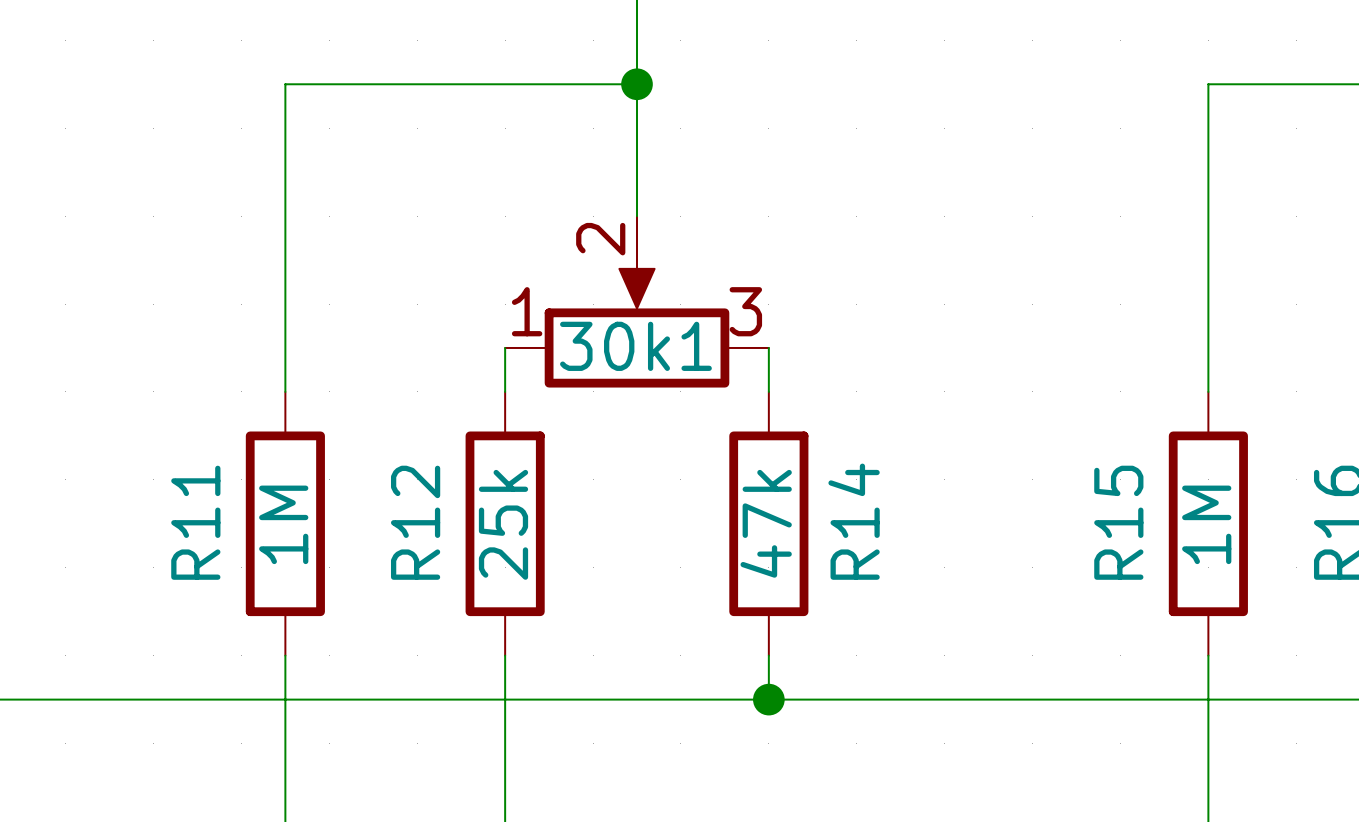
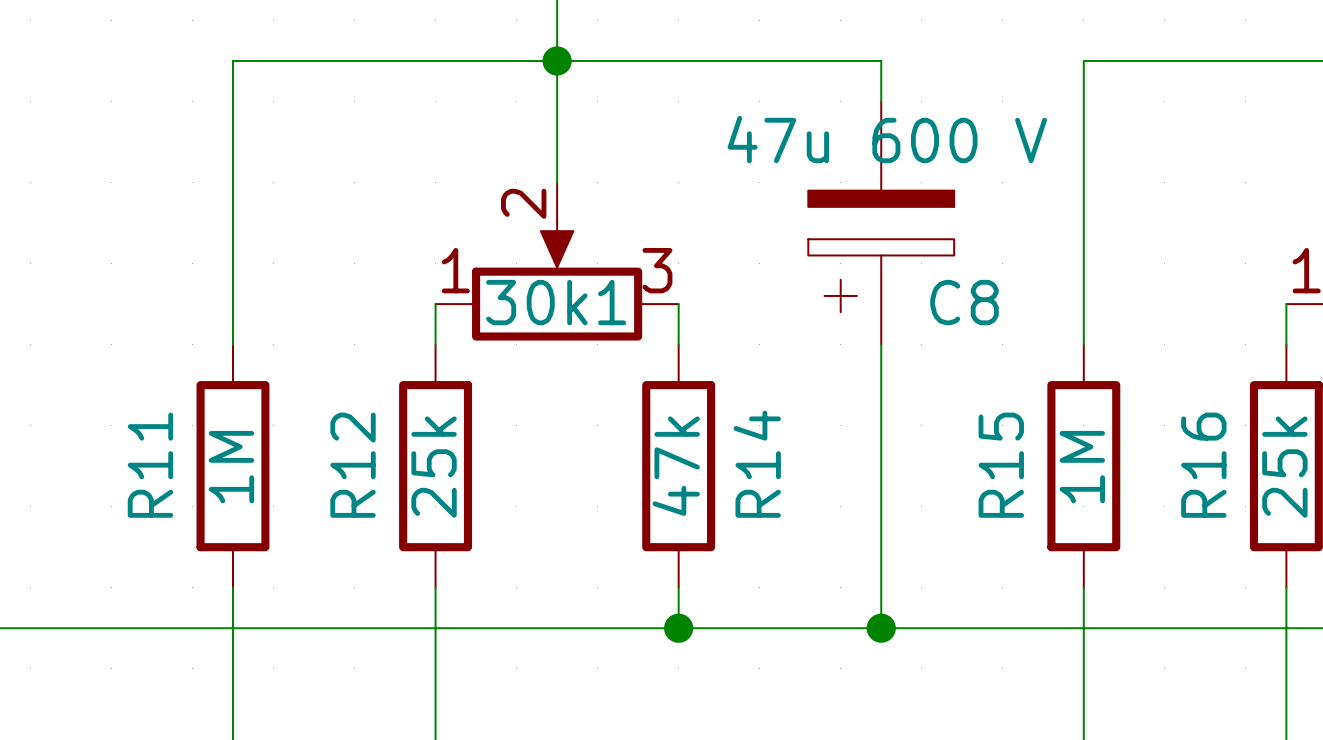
wire: none -> (557, 61) (881, 61) (881, 101)
C8: none -> 47u 600 V (881, 223)
wire: none -> (881, 344) (881, 628)
junction: none -> (881, 628)

